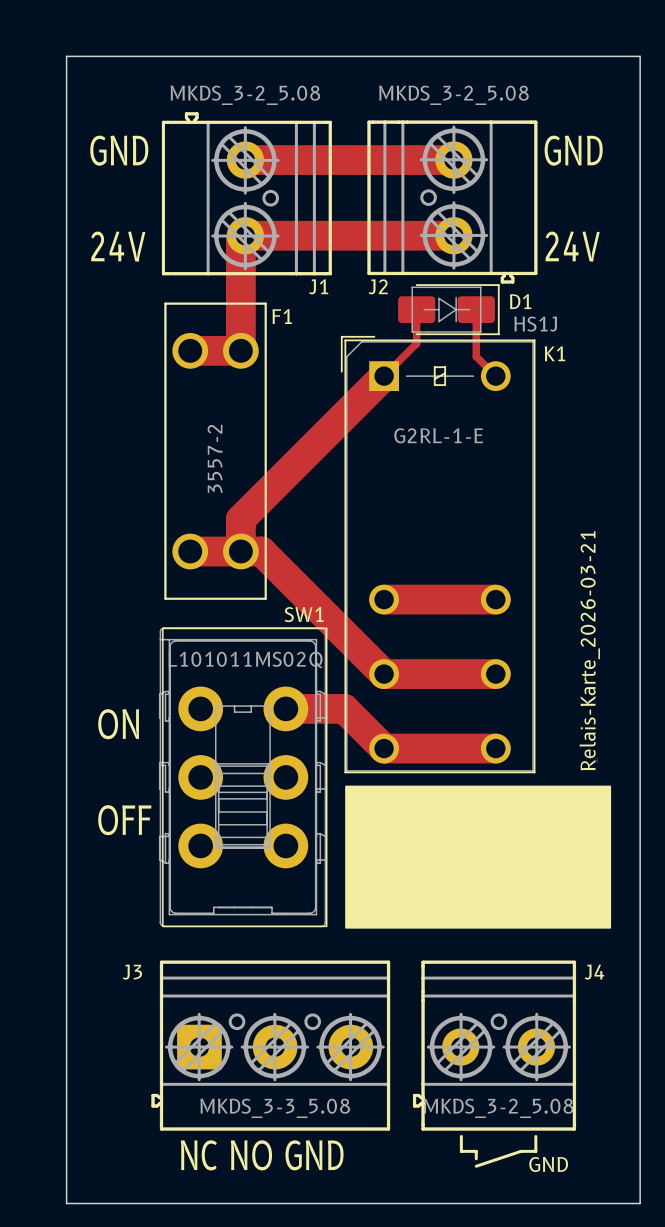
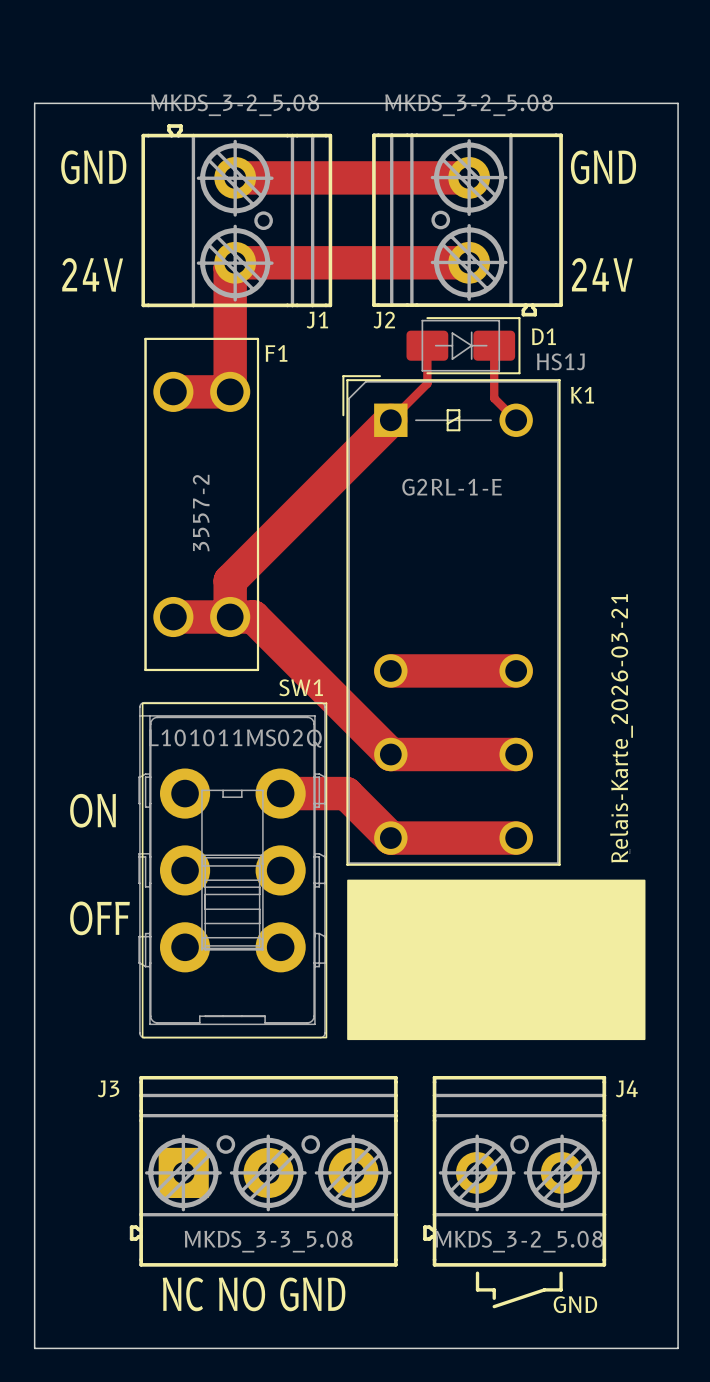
board edge: (66, 93) (66, 56) (640, 56) (640, 93) -> (34, 103) (678, 103)

